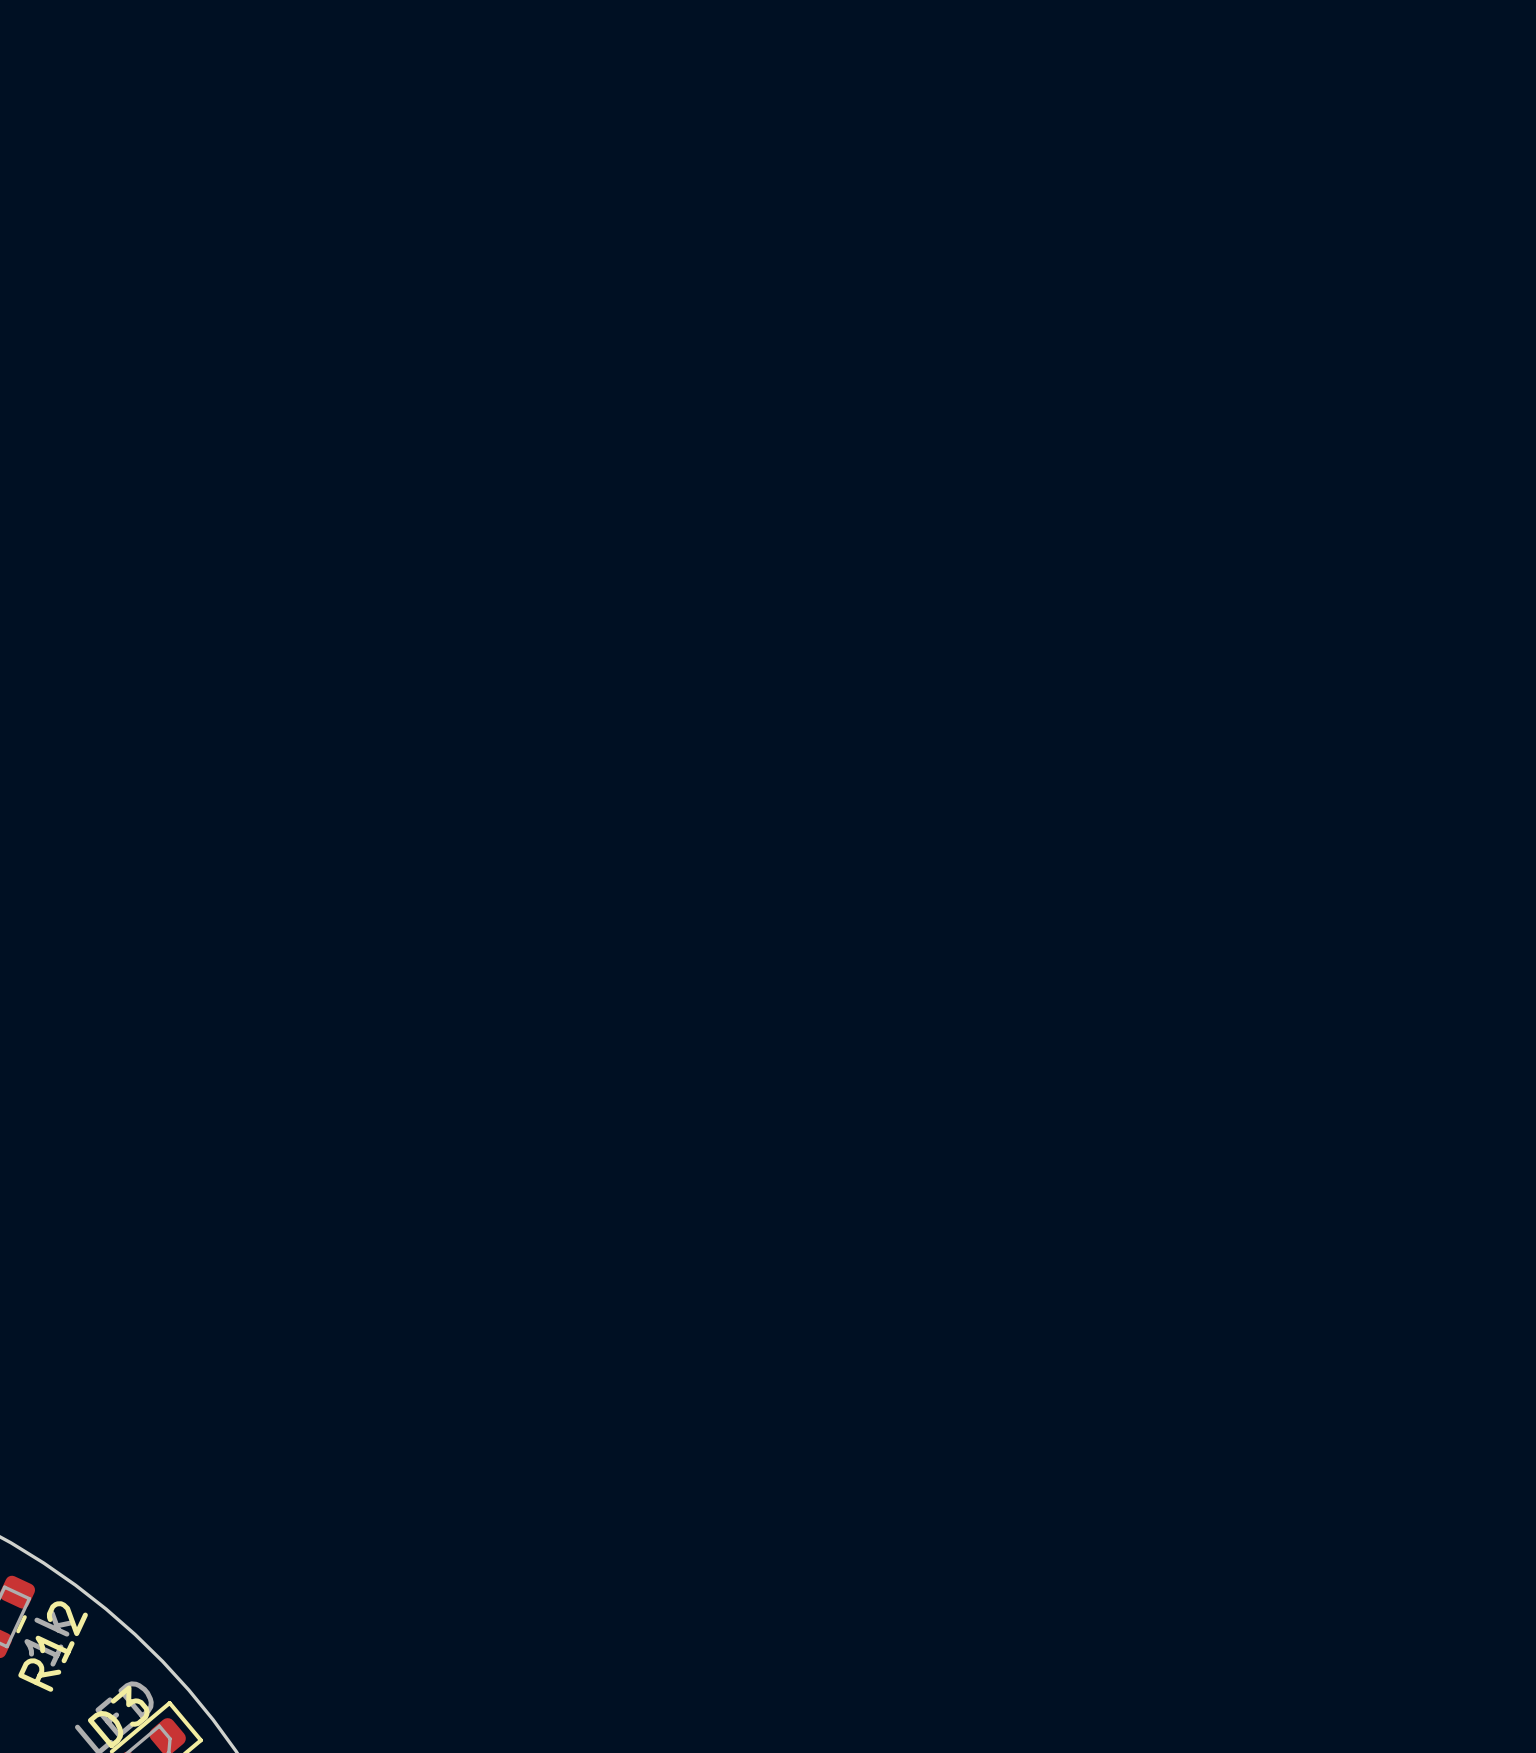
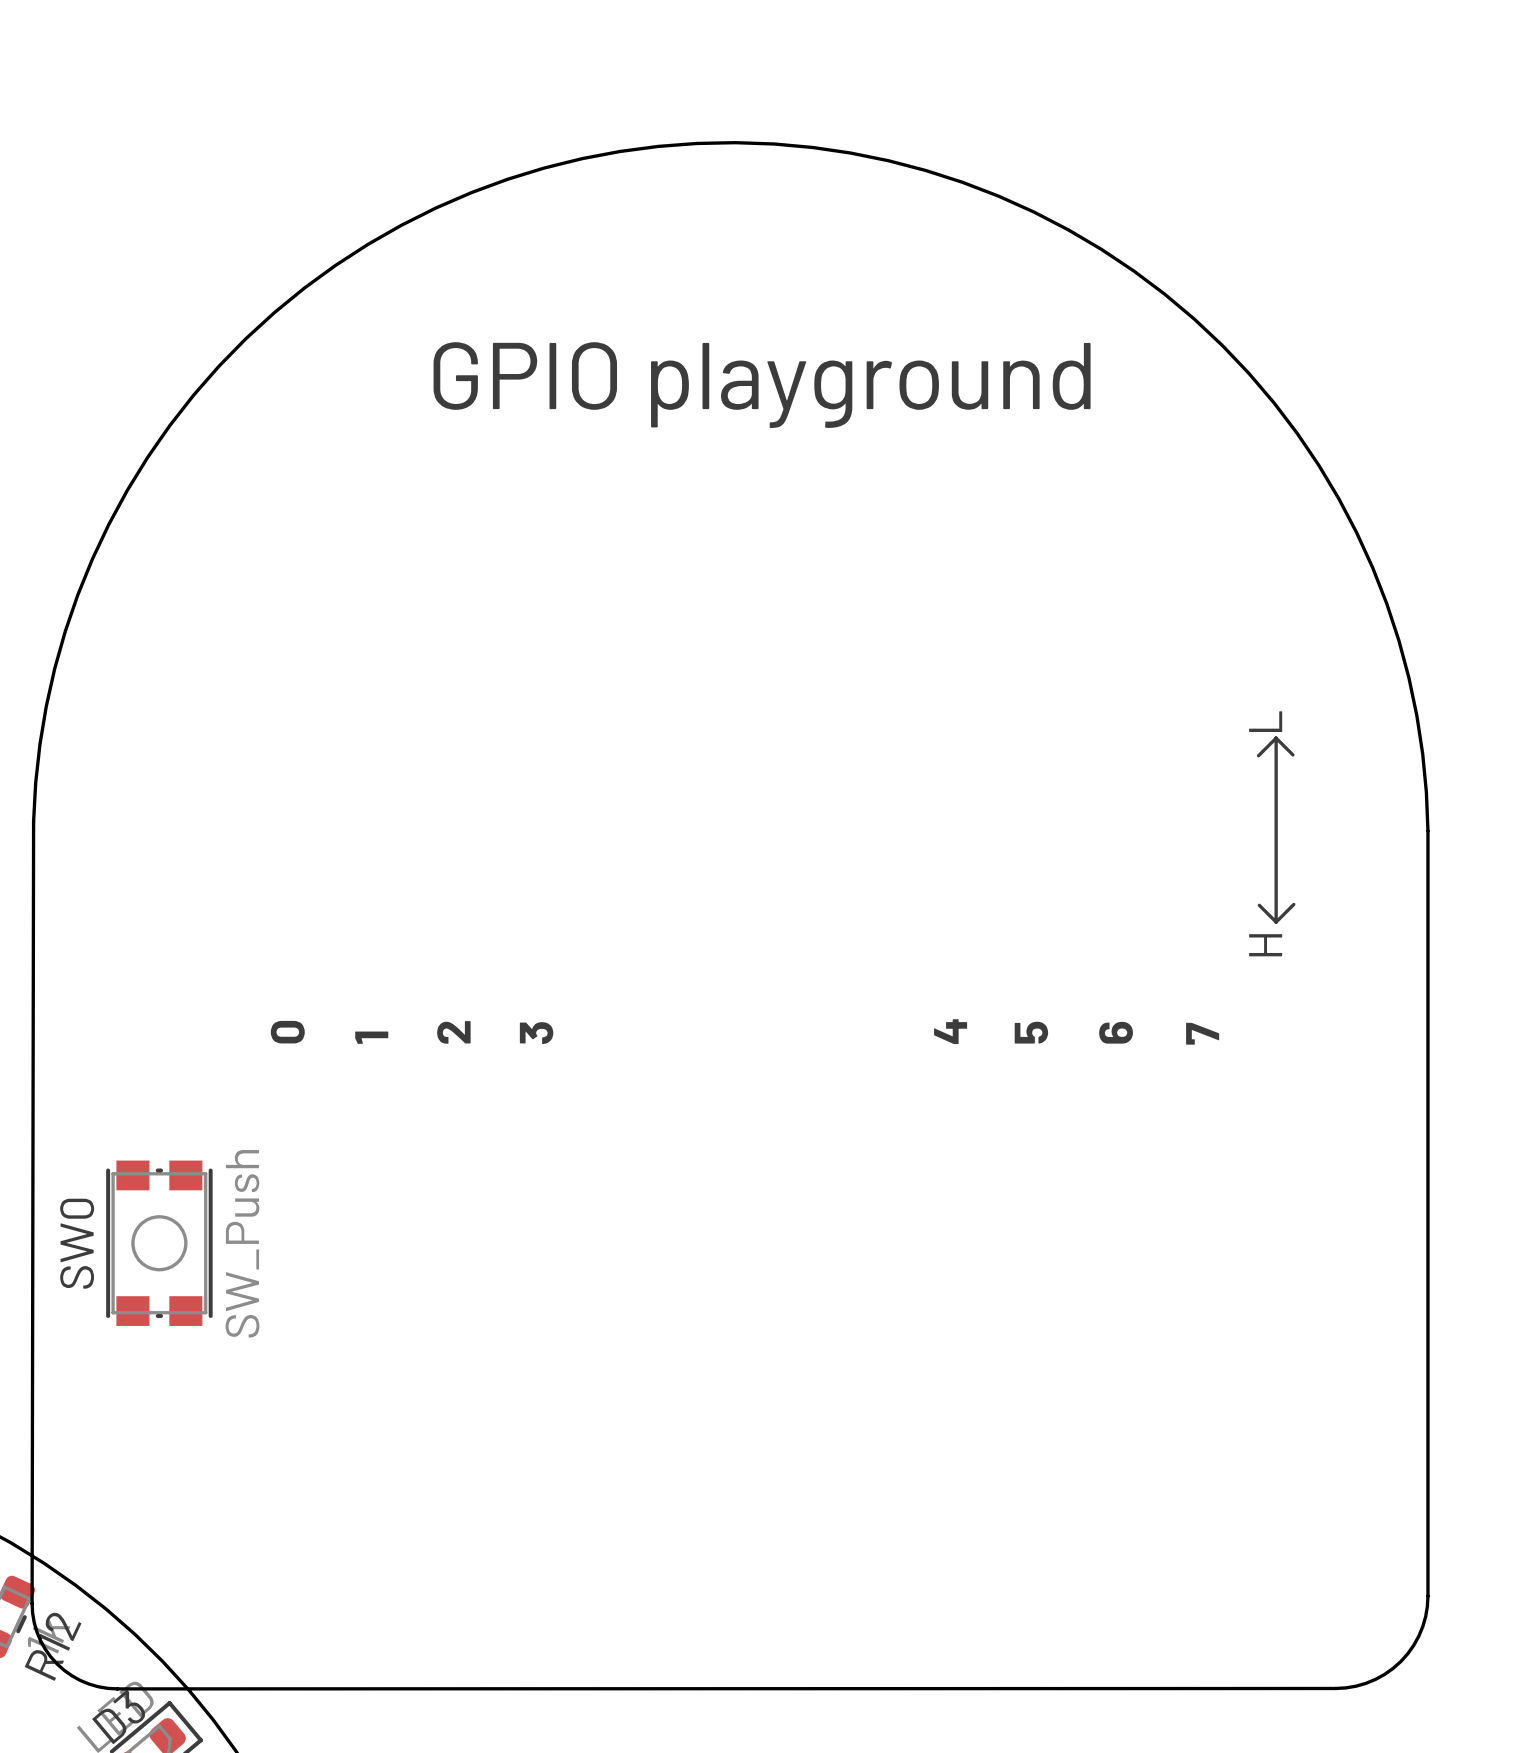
text: none -> GPIO playground (762, 385)
text: none -> L (1265, 721)
line: none -> (1276, 738) (1258, 755)
line: none -> (1276, 738) (1276, 922)
line: none -> (1276, 738) (1292, 754)
board edge: none -> (33, 821) (32, 1603) (34, 1622) (40, 1640) (50, 1656) (72, 1675) (89, 1684) (117, 1688) (1335, 1688) (1366, 1683) (1384, 1674) (1400, 1661) (1413, 1645) (1425, 1616) (1427, 1596) (1427, 830) (1422, 753) (1408, 677) (1386, 603) (1356, 532) (1338, 498) (1297, 433) (1273, 402) (1222, 345) (1164, 294) (1101, 249) (1068, 229) (998, 196) (925, 170) (888, 160) (812, 147) (735, 142) (696, 143) (620, 151) (544, 167) (471, 192) (401, 225) (335, 265) (304, 288) (245, 338) (193, 395) (147, 457) (108, 524) (77, 594) (65, 631) (54, 668) (39, 744) (33, 821)
line: none -> (1293, 904) (1276, 922)
line: none -> (1259, 905) (1276, 922)
text: none -> H (1265, 945)
text: none -> 4 (950, 1031)
text: none -> 0 (287, 1032)
text: none -> 1 (371, 1037)
text: none -> 5 (1031, 1032)
text: none -> 6 (1116, 1032)
text: none -> 7 (1202, 1033)
text: none -> 2 (453, 1032)
text: none -> 3 (536, 1033)
SW0: none -> SW_Push (159, 1243)

